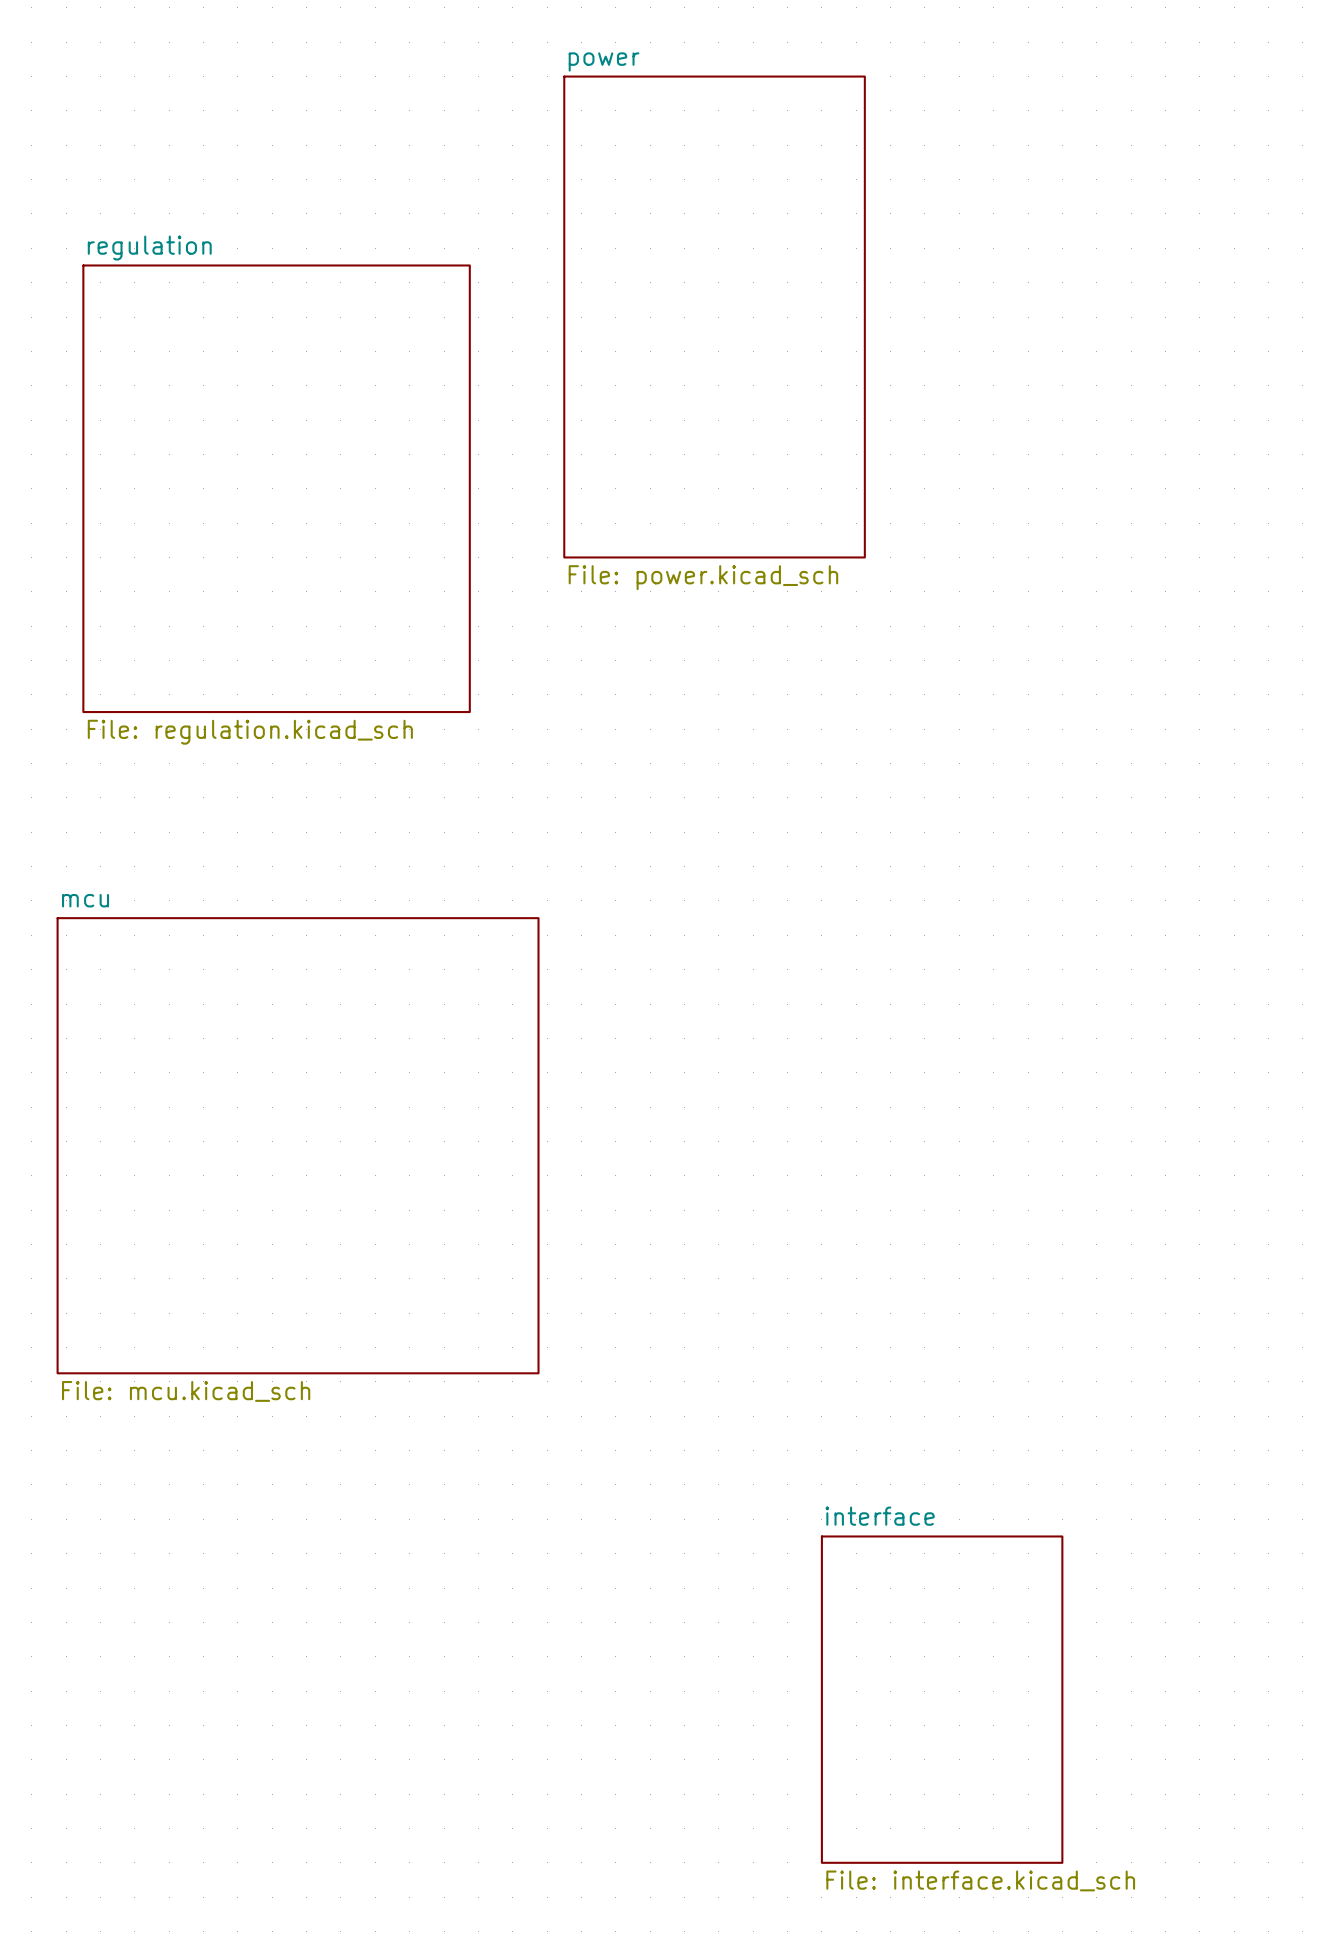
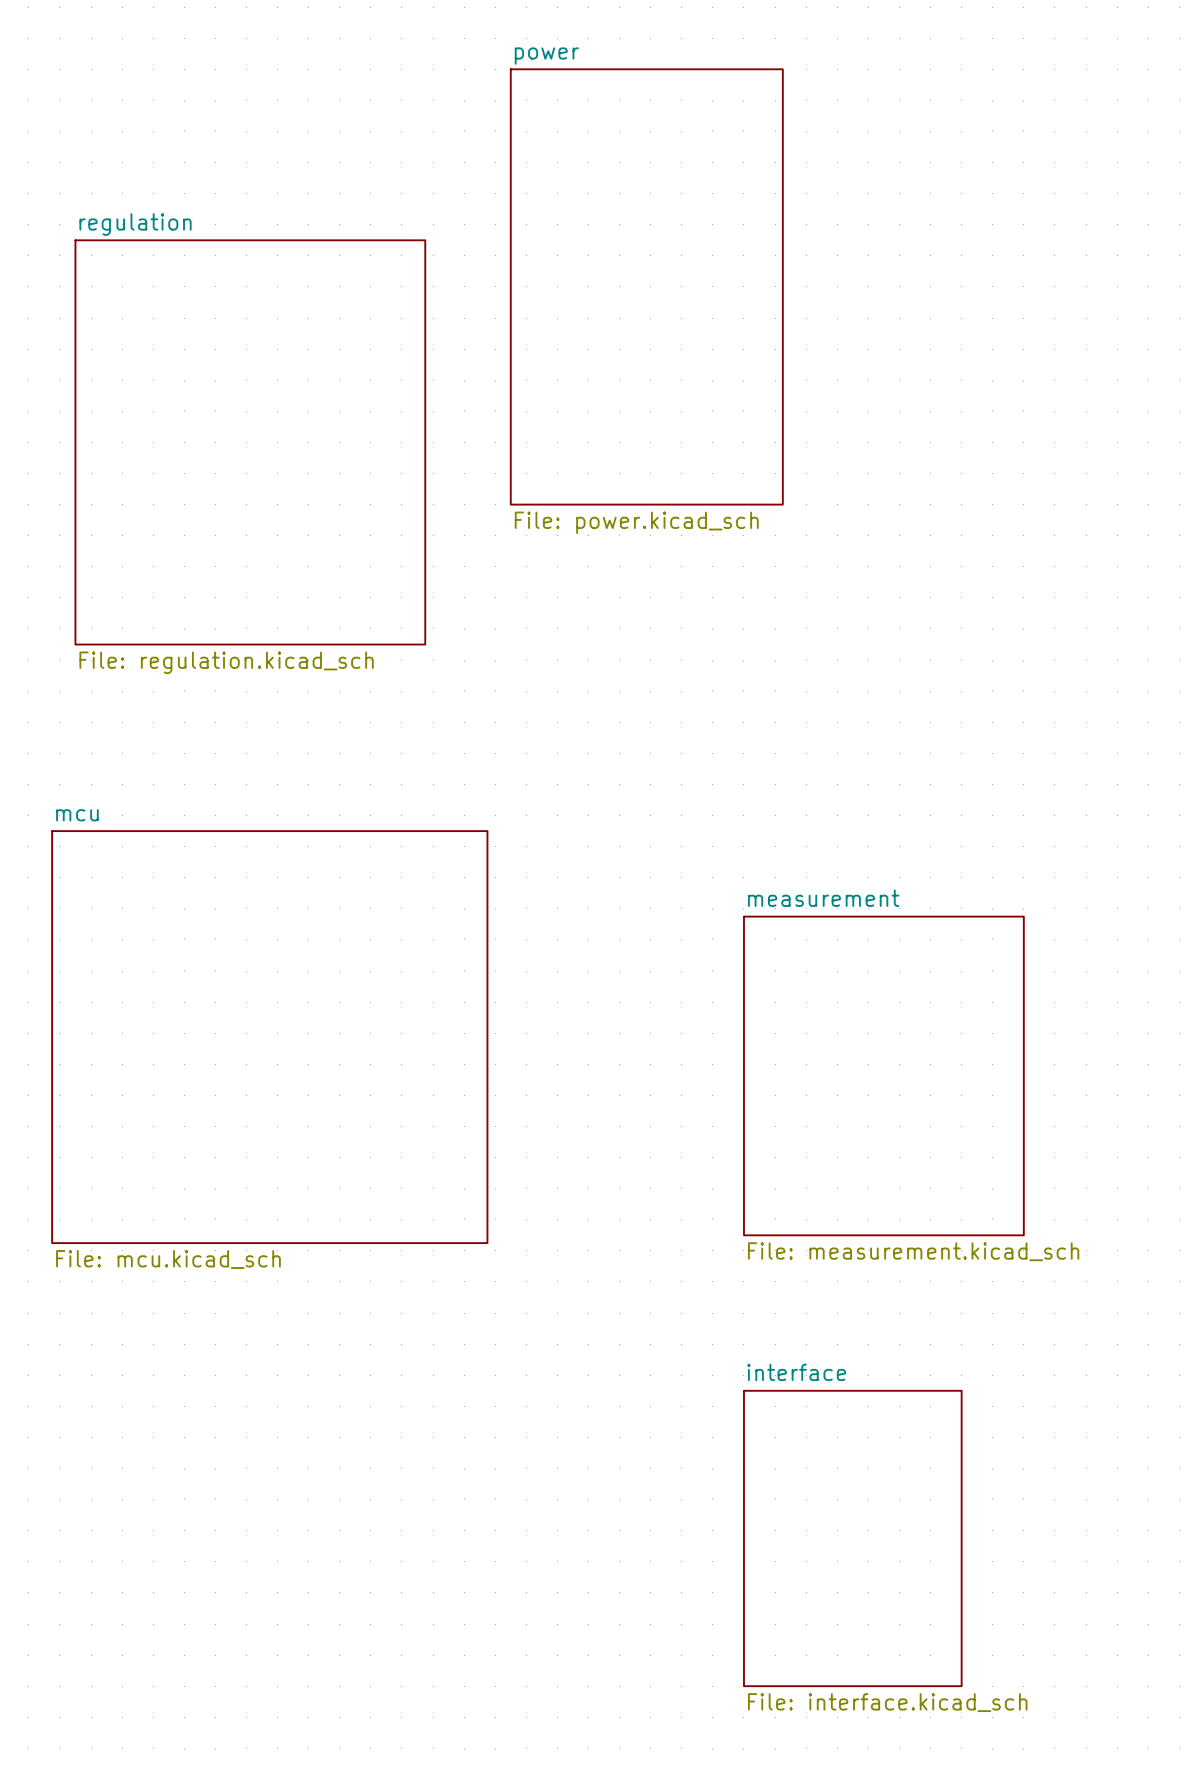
sheet measurement: none -> File: measurement.kicad_sch (883, 1075)

